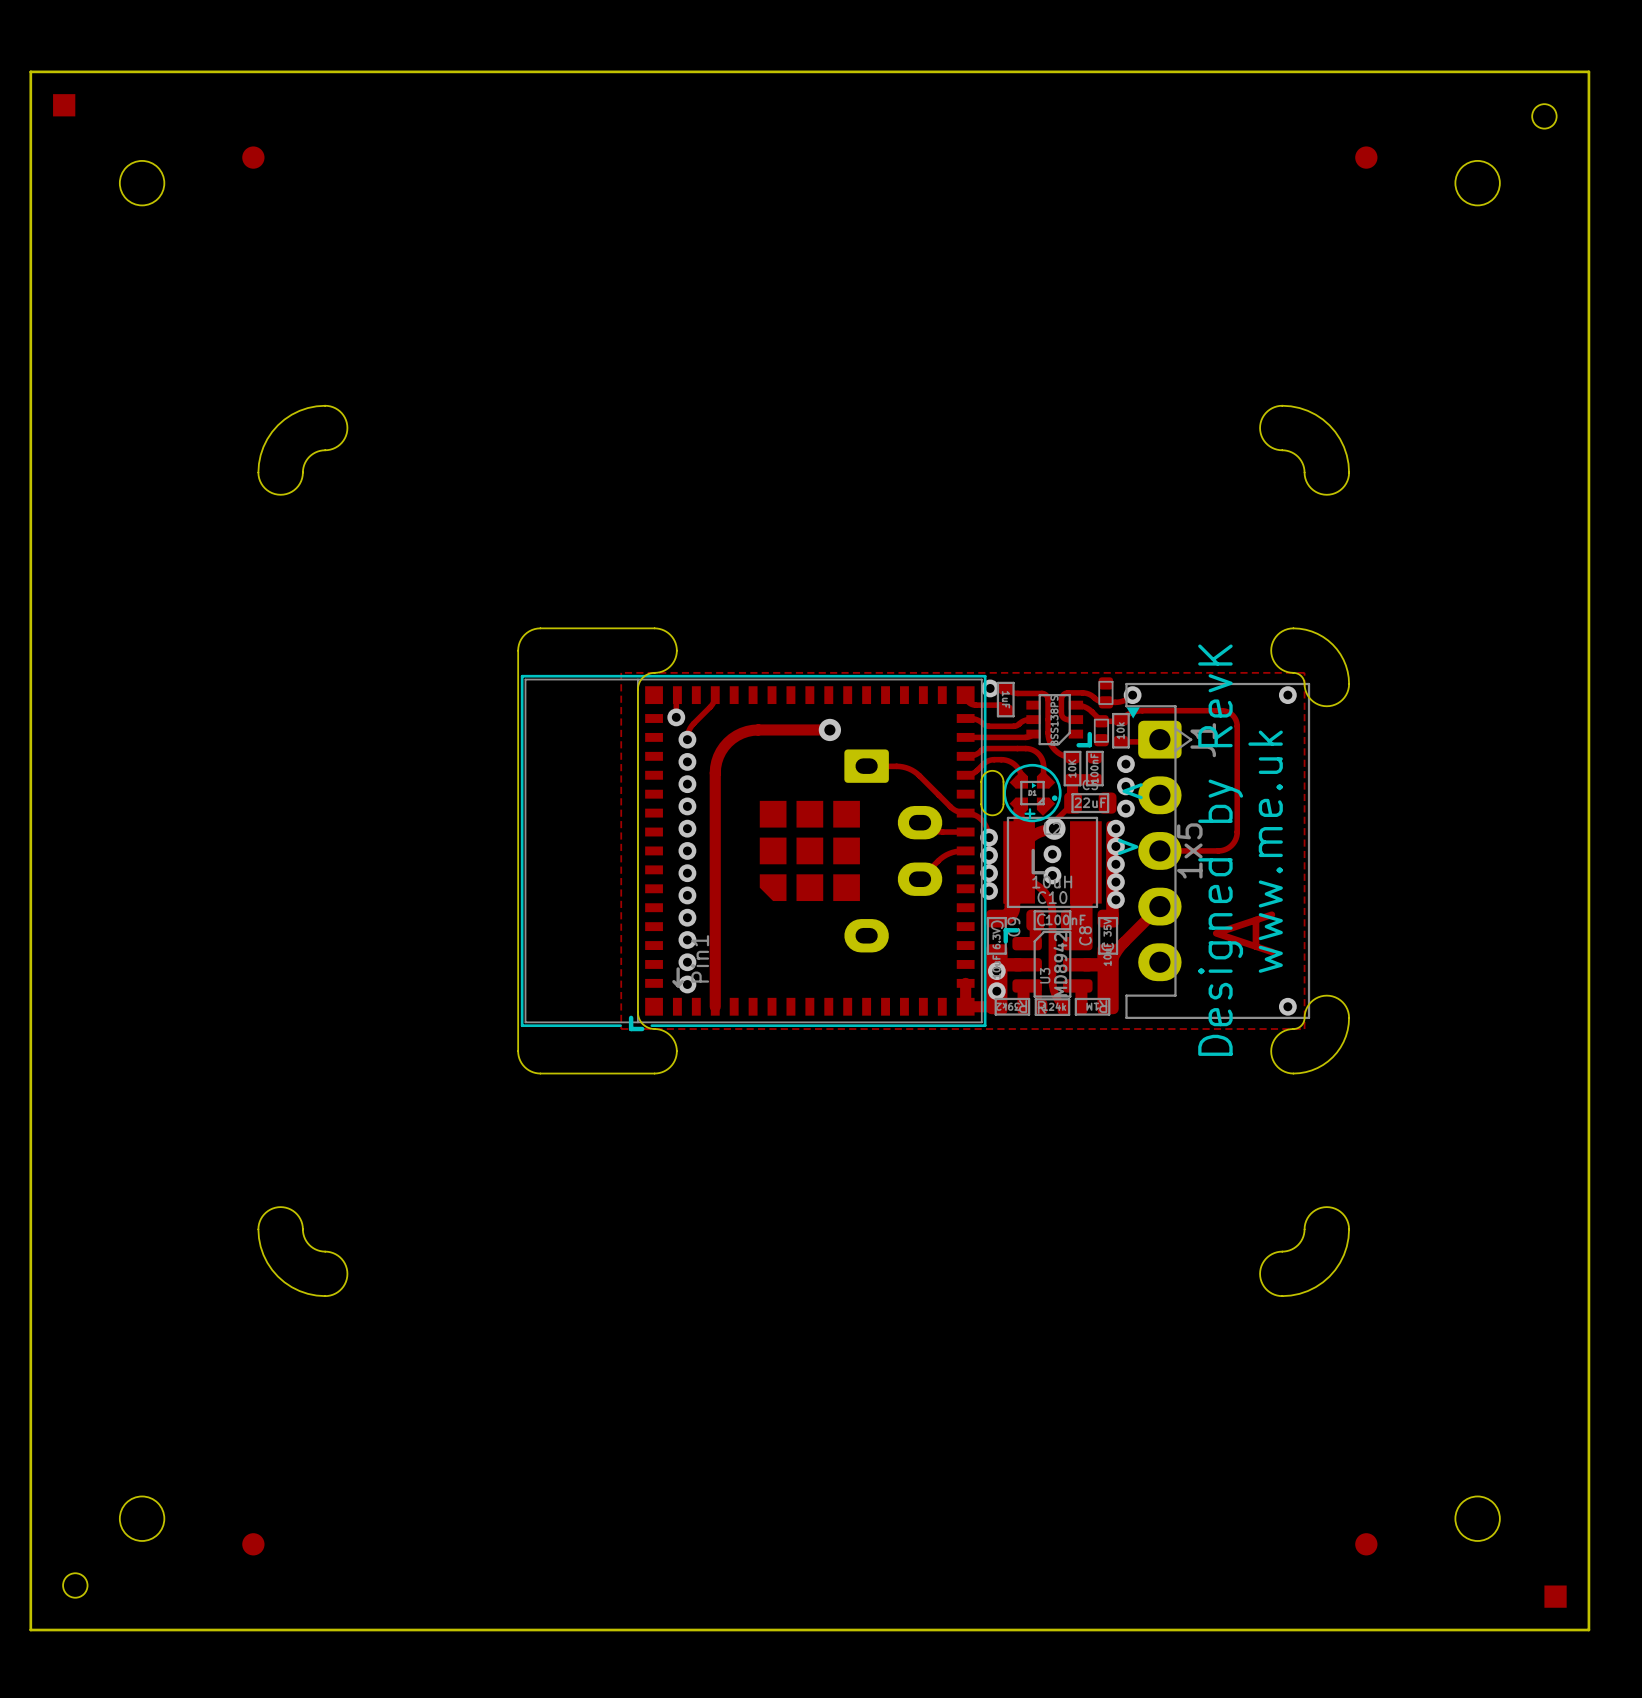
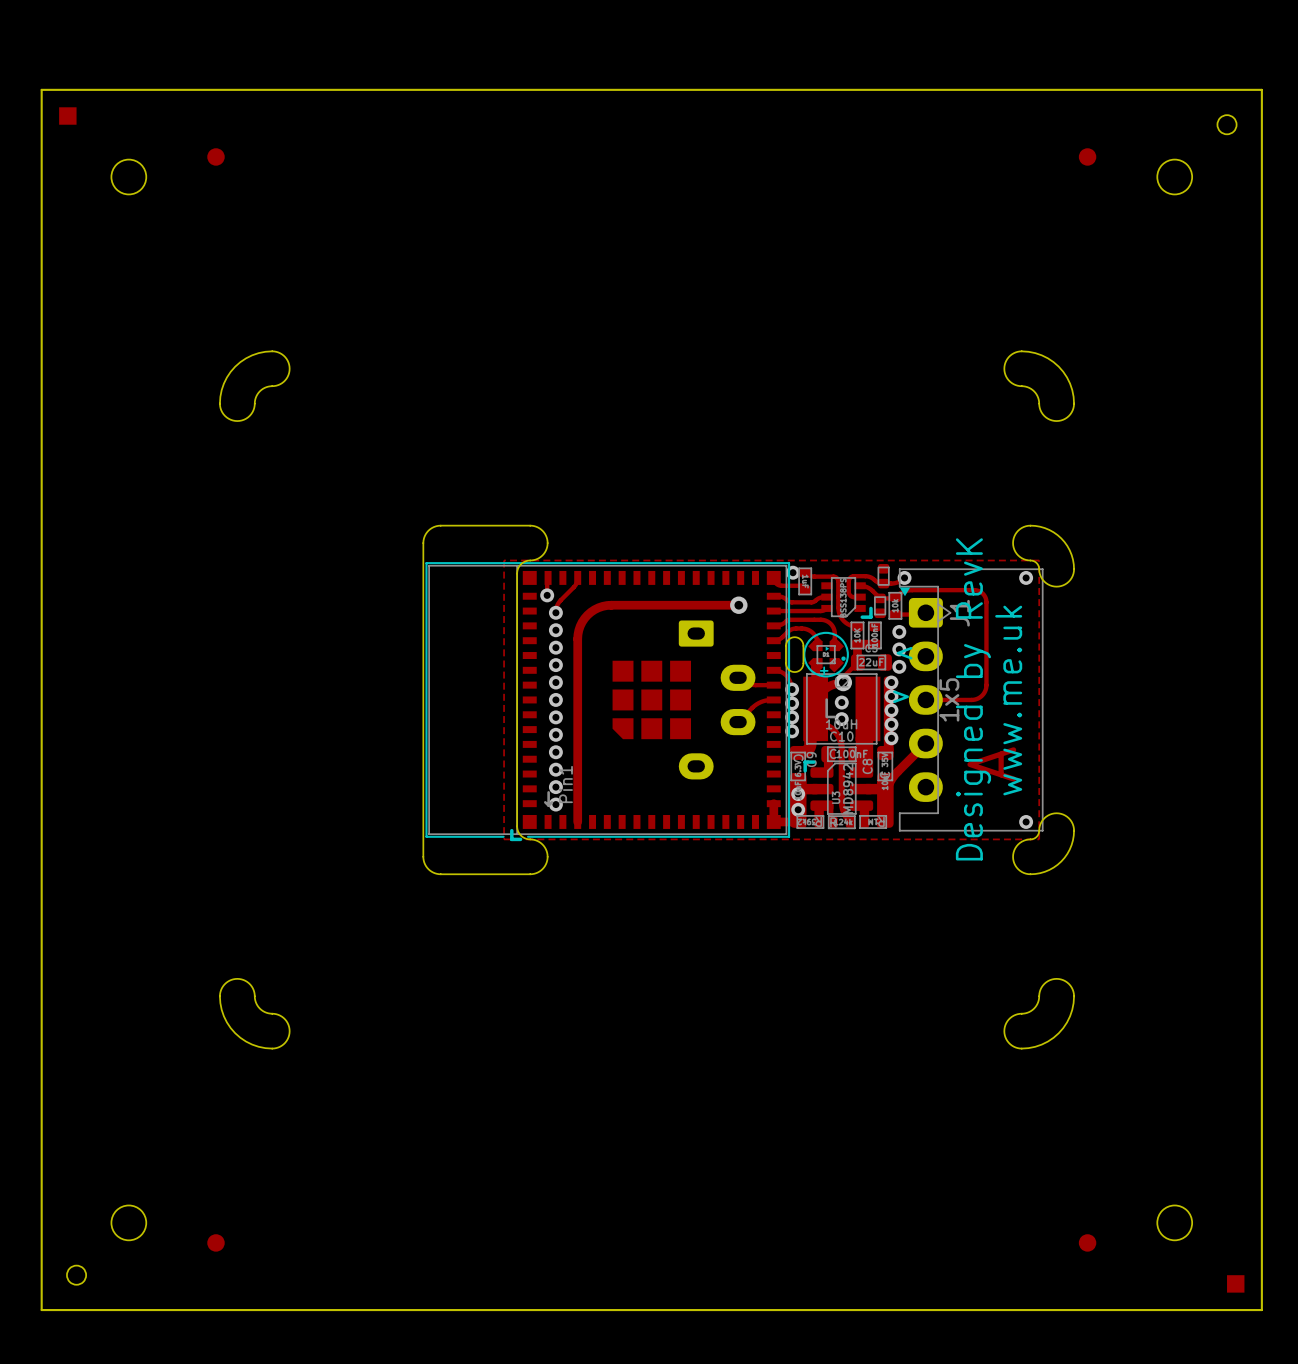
track: none -> (667, 605) (738, 605)
via position: (829, 729) -> (738, 605)
track: (866, 766) (899, 766) (911, 770) (952, 808) (965, 813) -> none

